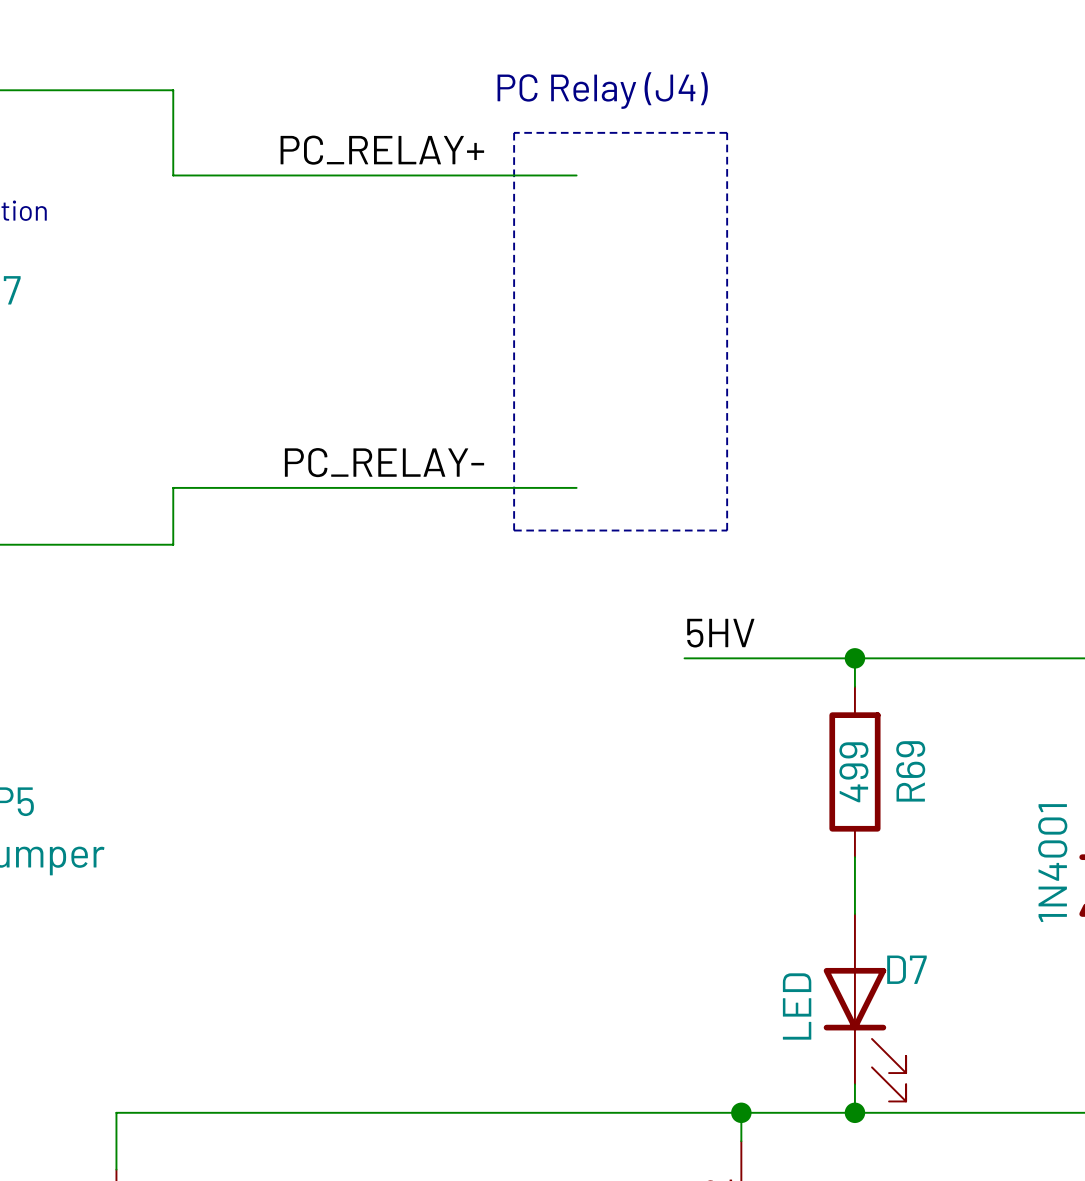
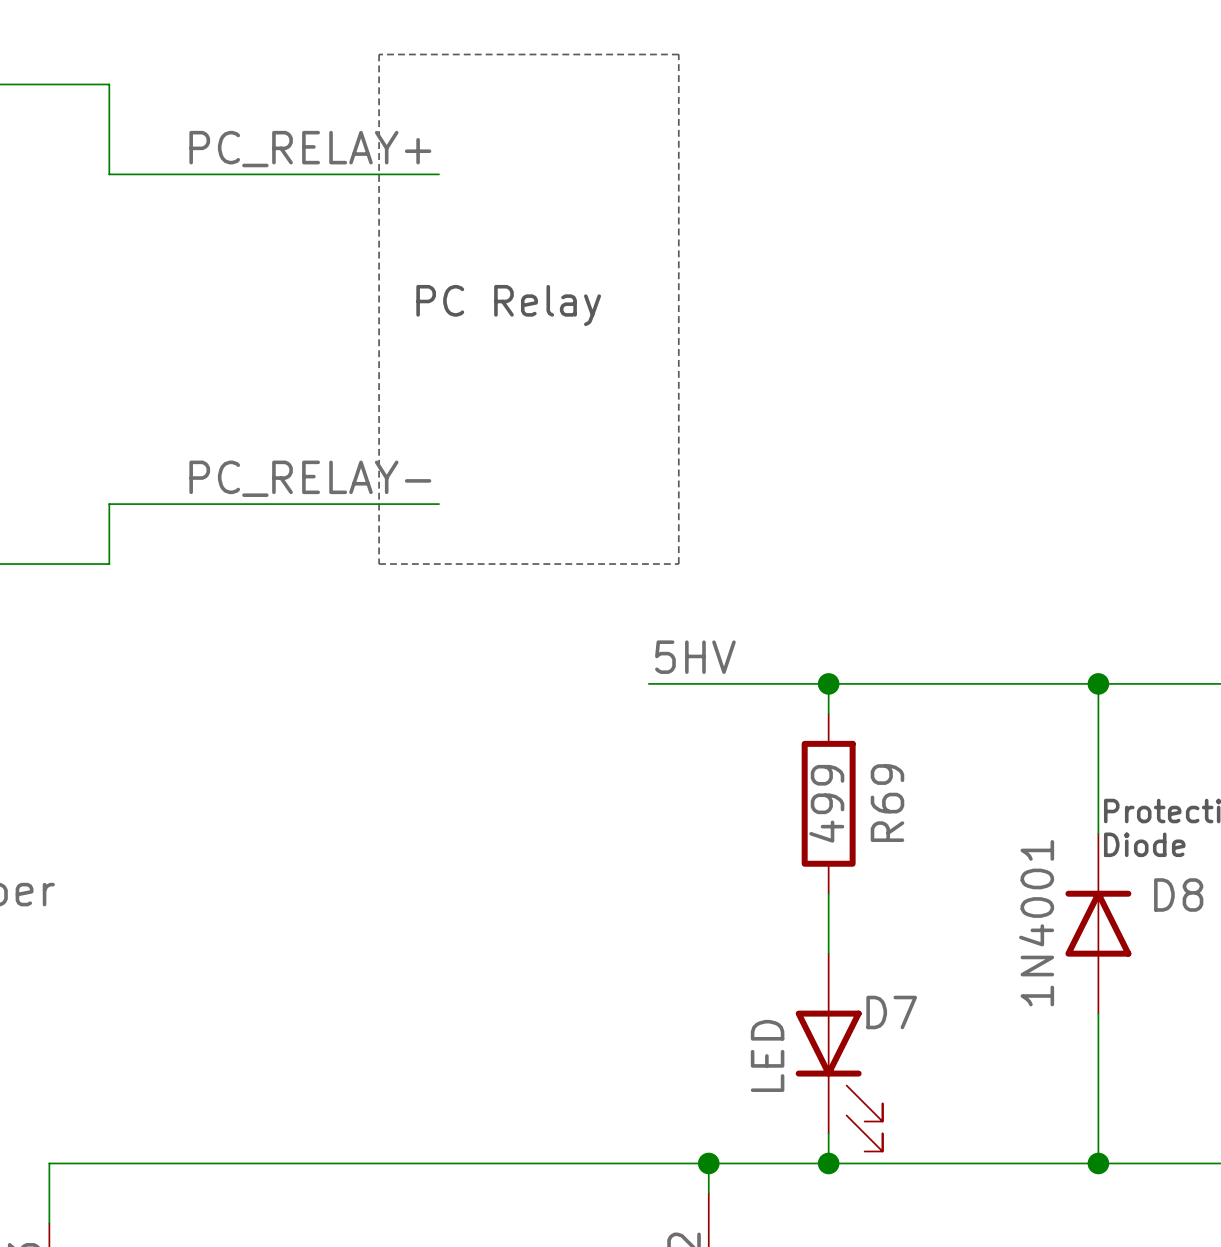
text: PC Relay (J4) (602, 90) -> none
line: (514, 132) (727, 132) (727, 530) (514, 530) (514, 132) -> (379, 54) (379, 564) (678, 564) (678, 54) (379, 54)
wire: (485, 175) (576, 175) -> none
text: none -> PC Relay (508, 305)
wire: (485, 487) (576, 487) -> none

